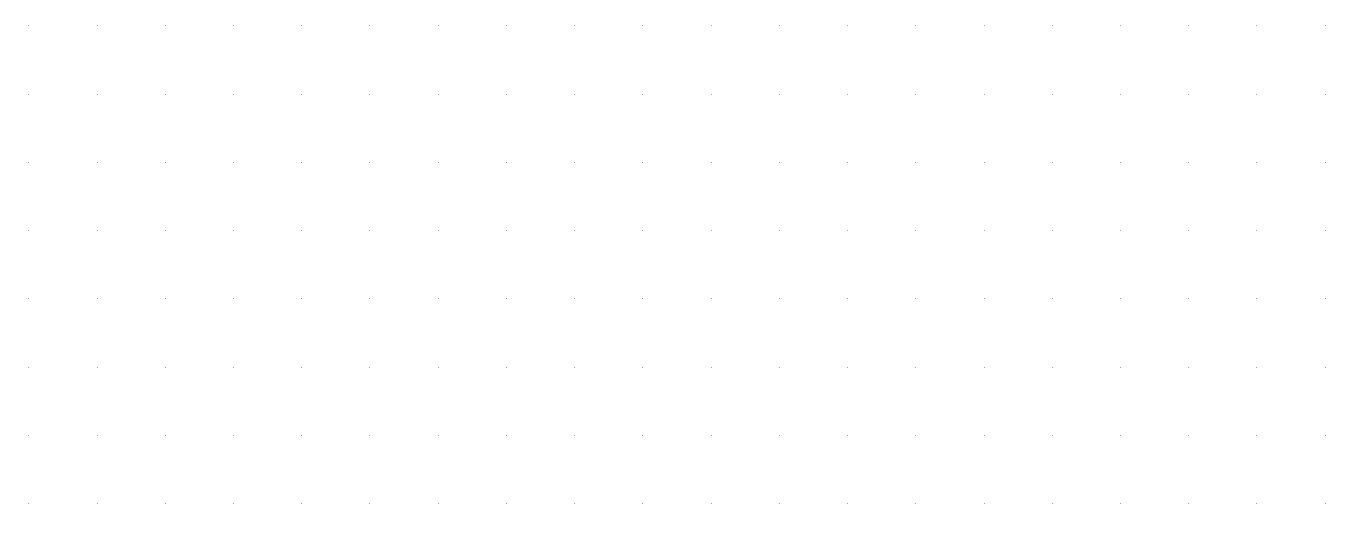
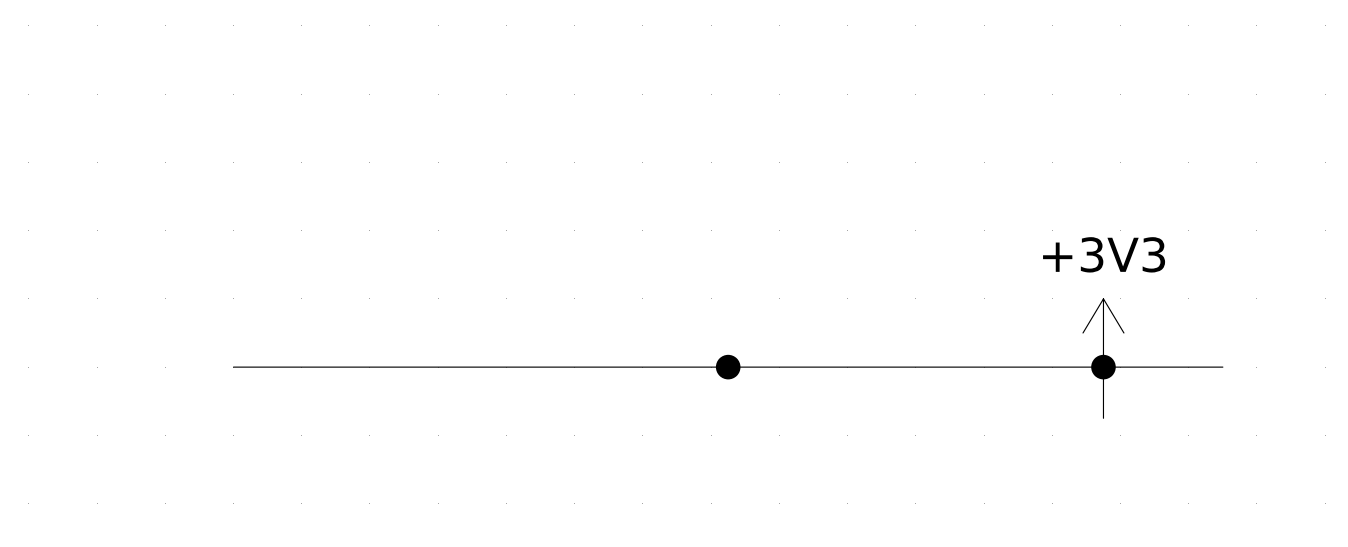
power symbol: none -> +3V3 (1103, 333)
wire: none -> (233, 367) (1222, 367)
junction: none -> (728, 367)
wire: none -> (1103, 367) (1103, 418)
junction: none -> (1103, 367)

